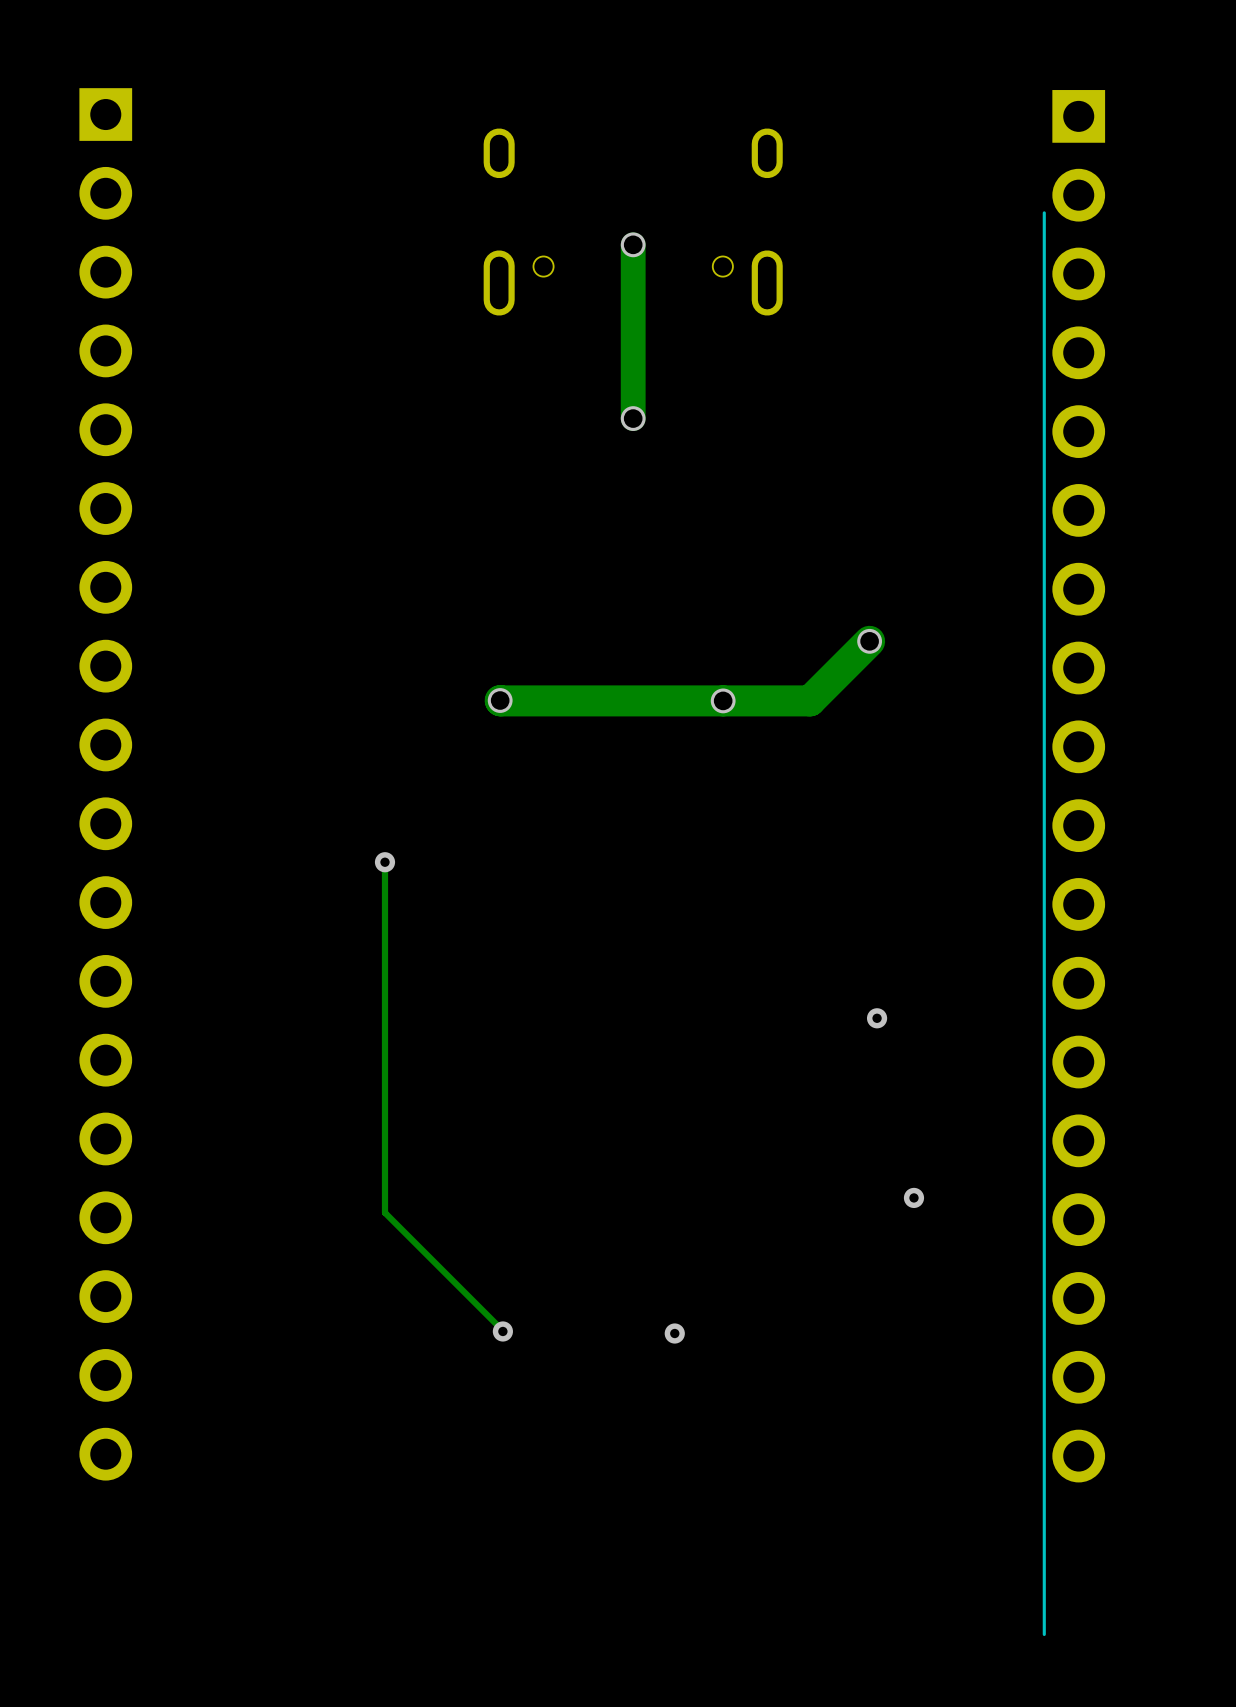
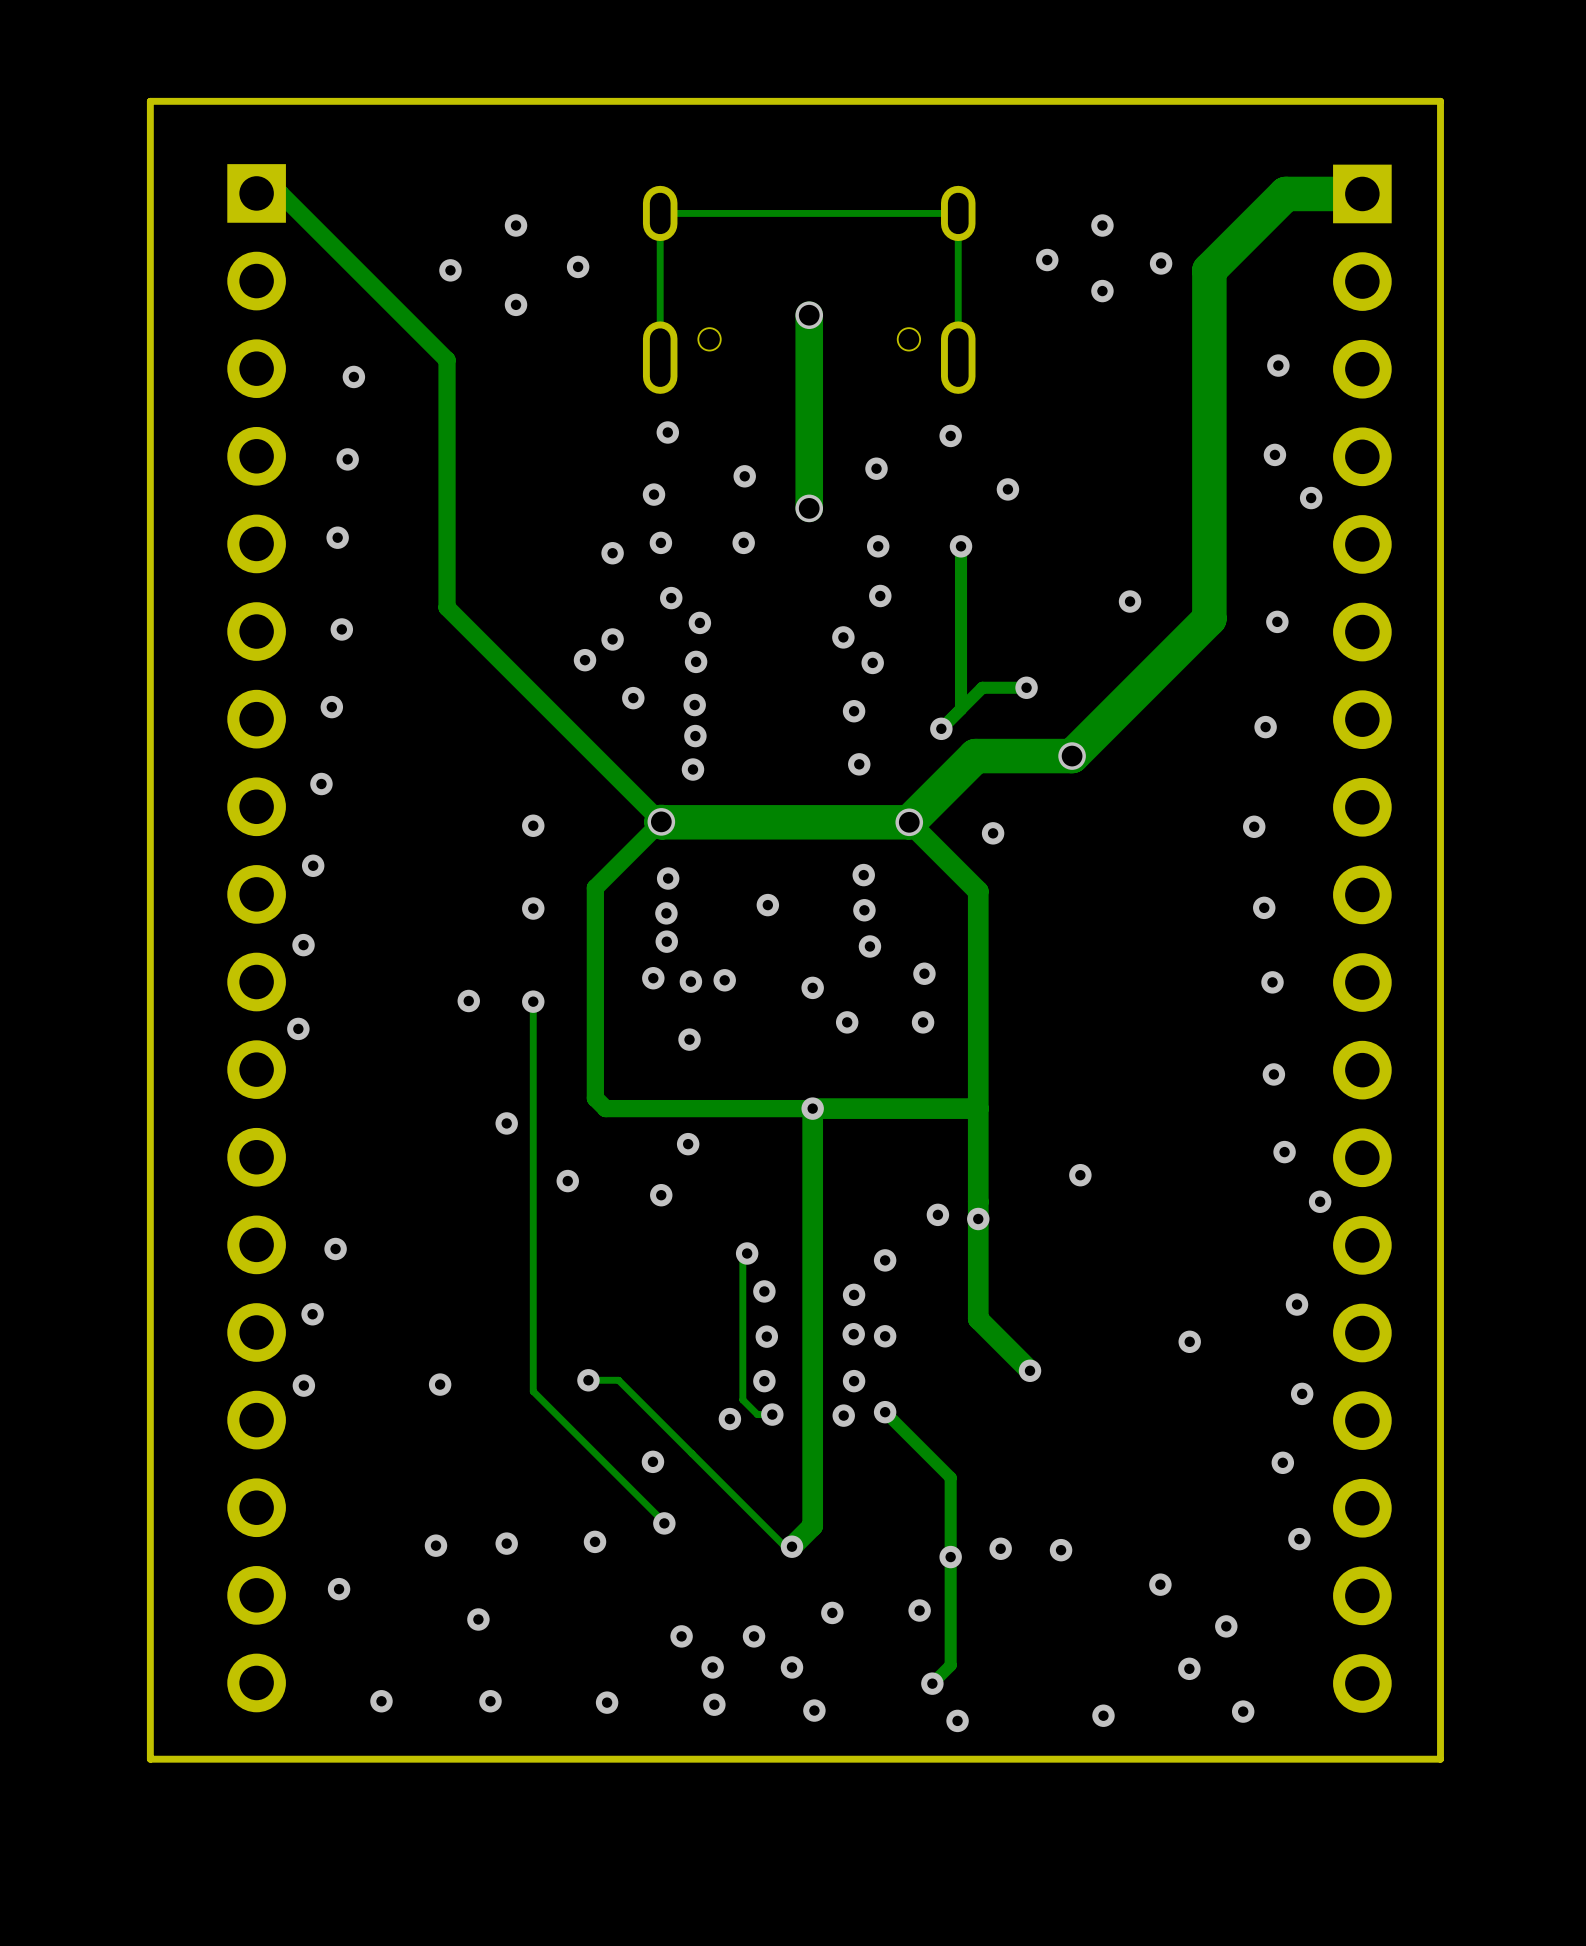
board edge: none -> (1440, 101) (150, 101) (150, 1759) (1440, 1759) (1440, 101)
track: none -> (256, 193) (280, 193) (447, 360) (447, 607) (661, 821) (595, 887) (595, 1098) (605, 1108) (812, 1108)
track: none -> (1362, 193) (1285, 193) (1209, 270) (1209, 618) (1072, 756) (975, 756) (909, 822) (978, 891) (978, 1319) (1030, 1370)
via: none -> (516, 225)
via: none -> (1102, 225)
via: none -> (1047, 260)
via: none -> (1161, 263)
via: none -> (578, 266)
via: none -> (450, 270)
line: (1044, 212) (1044, 1634) -> none
via: none -> (1102, 291)
via: none -> (516, 304)
track: none -> (958, 357) (958, 213) (660, 213) (660, 357)
via: none -> (1278, 365)
via: none -> (353, 376)
via: none -> (667, 432)
via: none -> (950, 435)
via: none -> (1274, 454)
via: none -> (347, 459)
via: none -> (876, 468)
via: none -> (744, 476)
via: none -> (1007, 489)
via: none -> (654, 494)
via: none -> (1311, 498)
via: none -> (337, 537)
via: none -> (660, 542)
via: none -> (743, 542)
via: none -> (878, 546)
track: none -> (961, 546) (961, 709)
via: none -> (961, 546)
via: none -> (612, 553)
via: none -> (880, 596)
via: none -> (671, 598)
via: none -> (1130, 601)
via: none -> (1277, 621)
via: none -> (699, 622)
via: none -> (341, 629)
via: none -> (843, 637)
via: none -> (612, 639)
via: none -> (585, 660)
via: none -> (696, 661)
via: none -> (872, 662)
track: none -> (1026, 687) (982, 687) (941, 728)
via: none -> (1026, 687)
via: none -> (633, 698)
via: none -> (694, 705)
via: none -> (331, 707)
via: none -> (854, 711)
via: none -> (1265, 727)
via: none -> (941, 728)
via: none -> (695, 736)
track: (869, 641) (810, 700) (723, 700) -> none
via: none -> (859, 764)
via: none -> (692, 769)
via: none -> (321, 784)
via: none -> (533, 825)
via: none -> (1254, 826)
via: none -> (993, 833)
via: none -> (313, 865)
via: none -> (863, 875)
via: none -> (668, 878)
via: none -> (767, 905)
via: none -> (1264, 907)
via: none -> (533, 908)
via: none -> (864, 910)
via: none -> (666, 913)
part position: (105, 784) -> (256, 938)
part position: (1078, 786) -> (1362, 938)
via: none -> (666, 941)
via: none -> (303, 945)
via: none -> (869, 946)
via: none -> (924, 973)
via: none -> (653, 978)
via: none -> (724, 980)
via: none -> (690, 981)
via: none -> (1272, 982)
via: none -> (812, 987)
via: none -> (468, 1000)
via: none -> (847, 1022)
via: none -> (923, 1022)
via: none -> (298, 1028)
via: none -> (689, 1039)
via: none -> (1273, 1074)
track: none -> (812, 1108) (812, 1526) (791, 1546) (785, 1546) (618, 1380) (588, 1380)
via: none -> (812, 1108)
track: none -> (978, 1108) (812, 1108)
via: none -> (506, 1123)
via: none -> (688, 1144)
via: none -> (1284, 1152)
via: none -> (567, 1181)
via: none -> (661, 1195)
via: none -> (1320, 1201)
via: none -> (937, 1214)
via: none -> (978, 1219)
via: none -> (335, 1249)
track: none -> (747, 1253) (742, 1257) (742, 1399) (757, 1414) (772, 1414)
via: none -> (747, 1253)
via: none -> (885, 1260)
via: none -> (764, 1291)
via: none -> (854, 1294)
via: none -> (1297, 1304)
via: none -> (312, 1314)
via: none -> (853, 1334)
via: none -> (766, 1336)
via: none -> (885, 1336)
via: none -> (1189, 1341)
via: none -> (1030, 1370)
via: (913, 1197) -> none
via: none -> (588, 1380)
via: none -> (764, 1381)
via: none -> (854, 1381)
via: none -> (440, 1384)
via: none -> (303, 1385)
via: none -> (1302, 1393)
track: none -> (885, 1412) (950, 1477) (950, 1665) (932, 1683)
via: none -> (885, 1412)
via: none -> (772, 1414)
via: none -> (843, 1415)
via: none -> (729, 1419)
via: none -> (652, 1461)
via: none -> (1282, 1462)
via: (674, 1333) -> none
via: none -> (1299, 1539)
via: none -> (595, 1541)
via: none -> (506, 1543)
via: none -> (435, 1545)
via: none -> (791, 1546)
via: none -> (1000, 1548)
via: none -> (1061, 1550)
via: none -> (950, 1557)
via: none -> (1160, 1584)
via: none -> (339, 1589)
via: none -> (919, 1610)
via: none -> (832, 1612)
via: none -> (478, 1619)
via: none -> (1226, 1626)
via: none -> (681, 1636)
via: none -> (754, 1636)
via: none -> (712, 1667)
via: none -> (791, 1667)
via: none -> (1189, 1668)
via: none -> (932, 1683)
via: none -> (381, 1701)
via: none -> (490, 1701)
via: none -> (607, 1702)
via: none -> (714, 1704)
via: none -> (814, 1710)
via: none -> (1243, 1711)
via: none -> (1103, 1715)
via: none -> (957, 1720)

